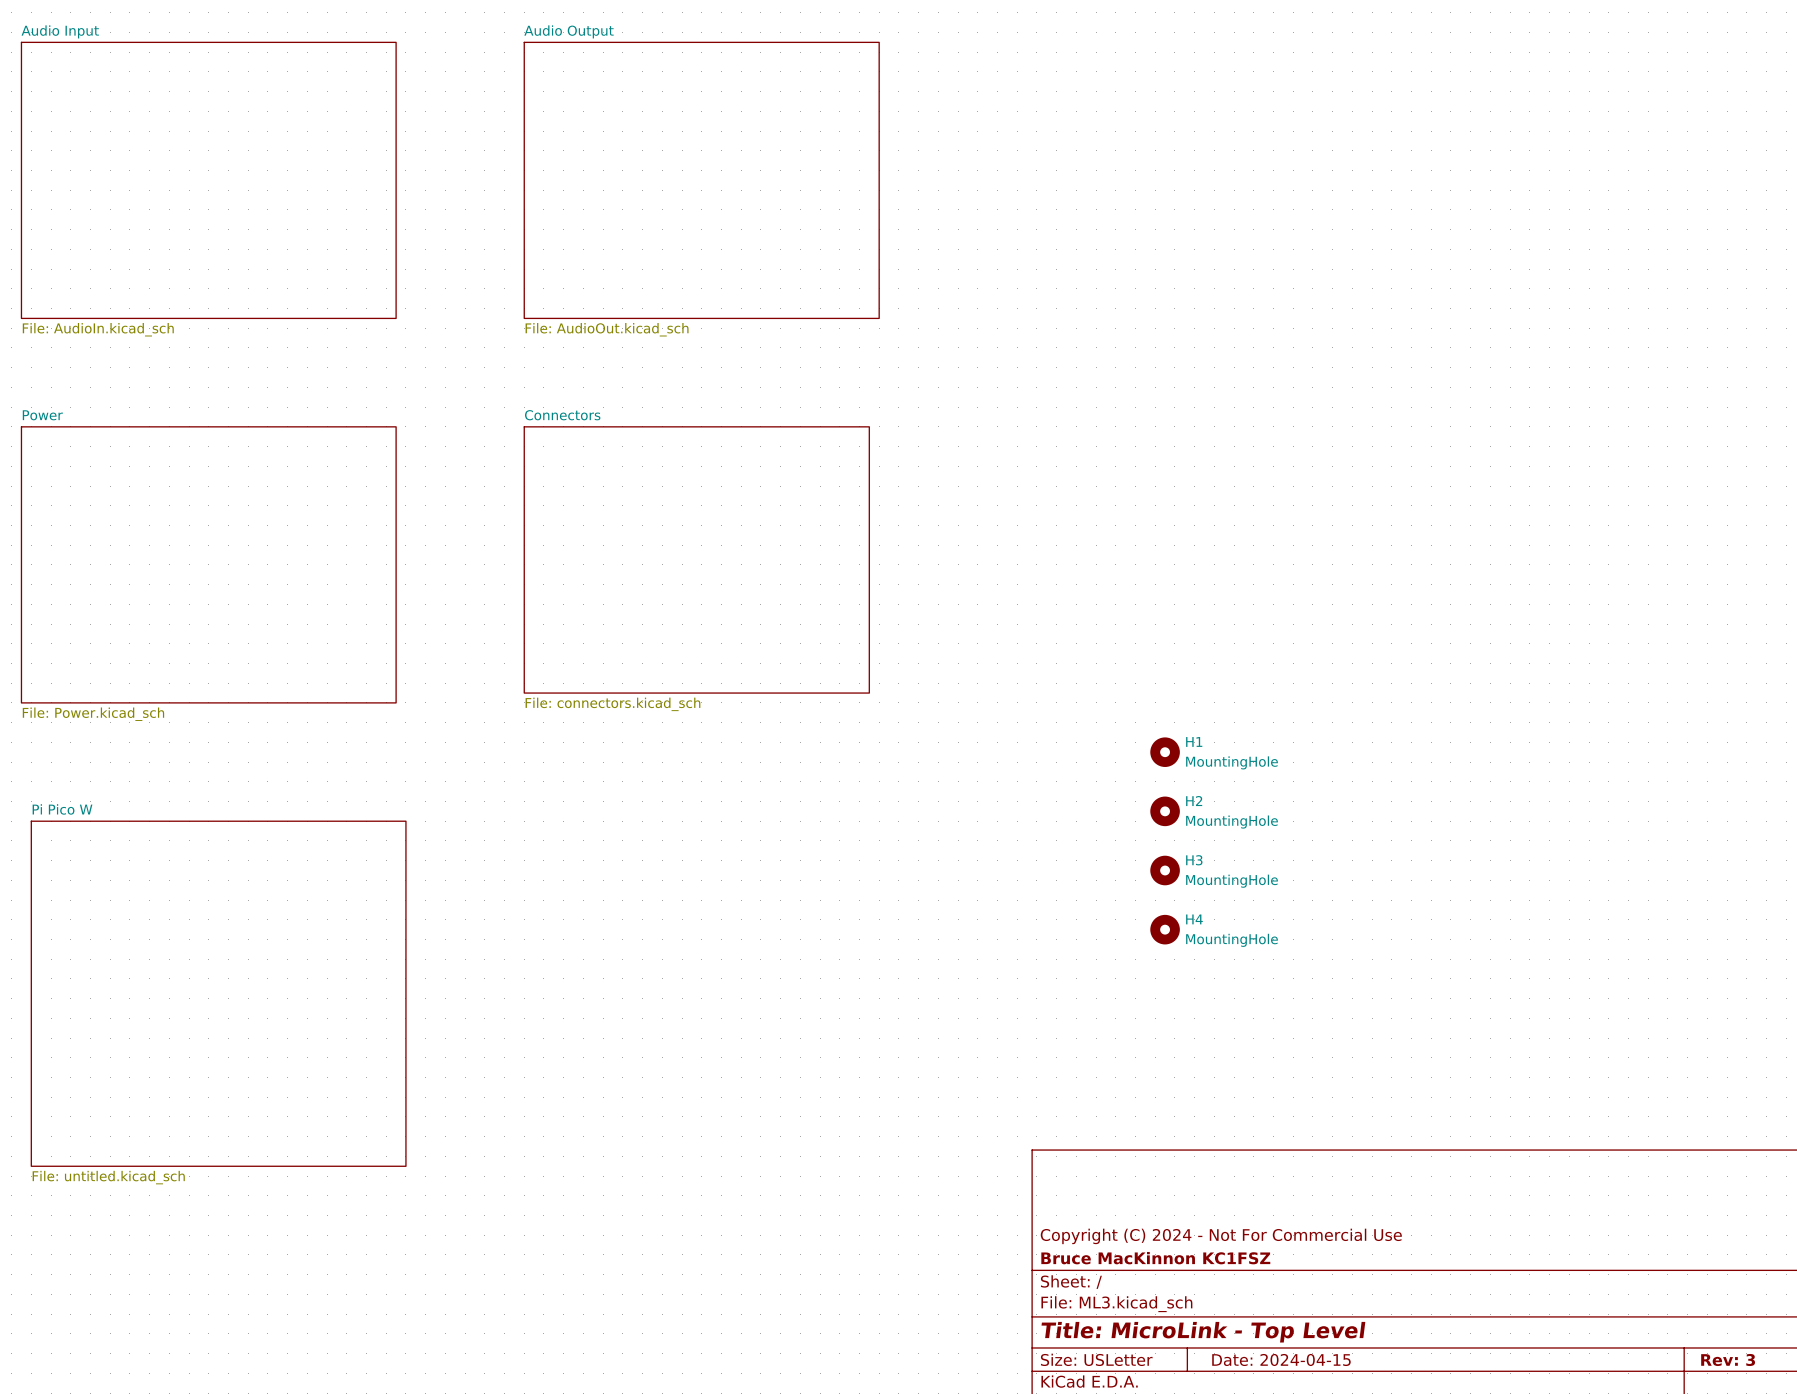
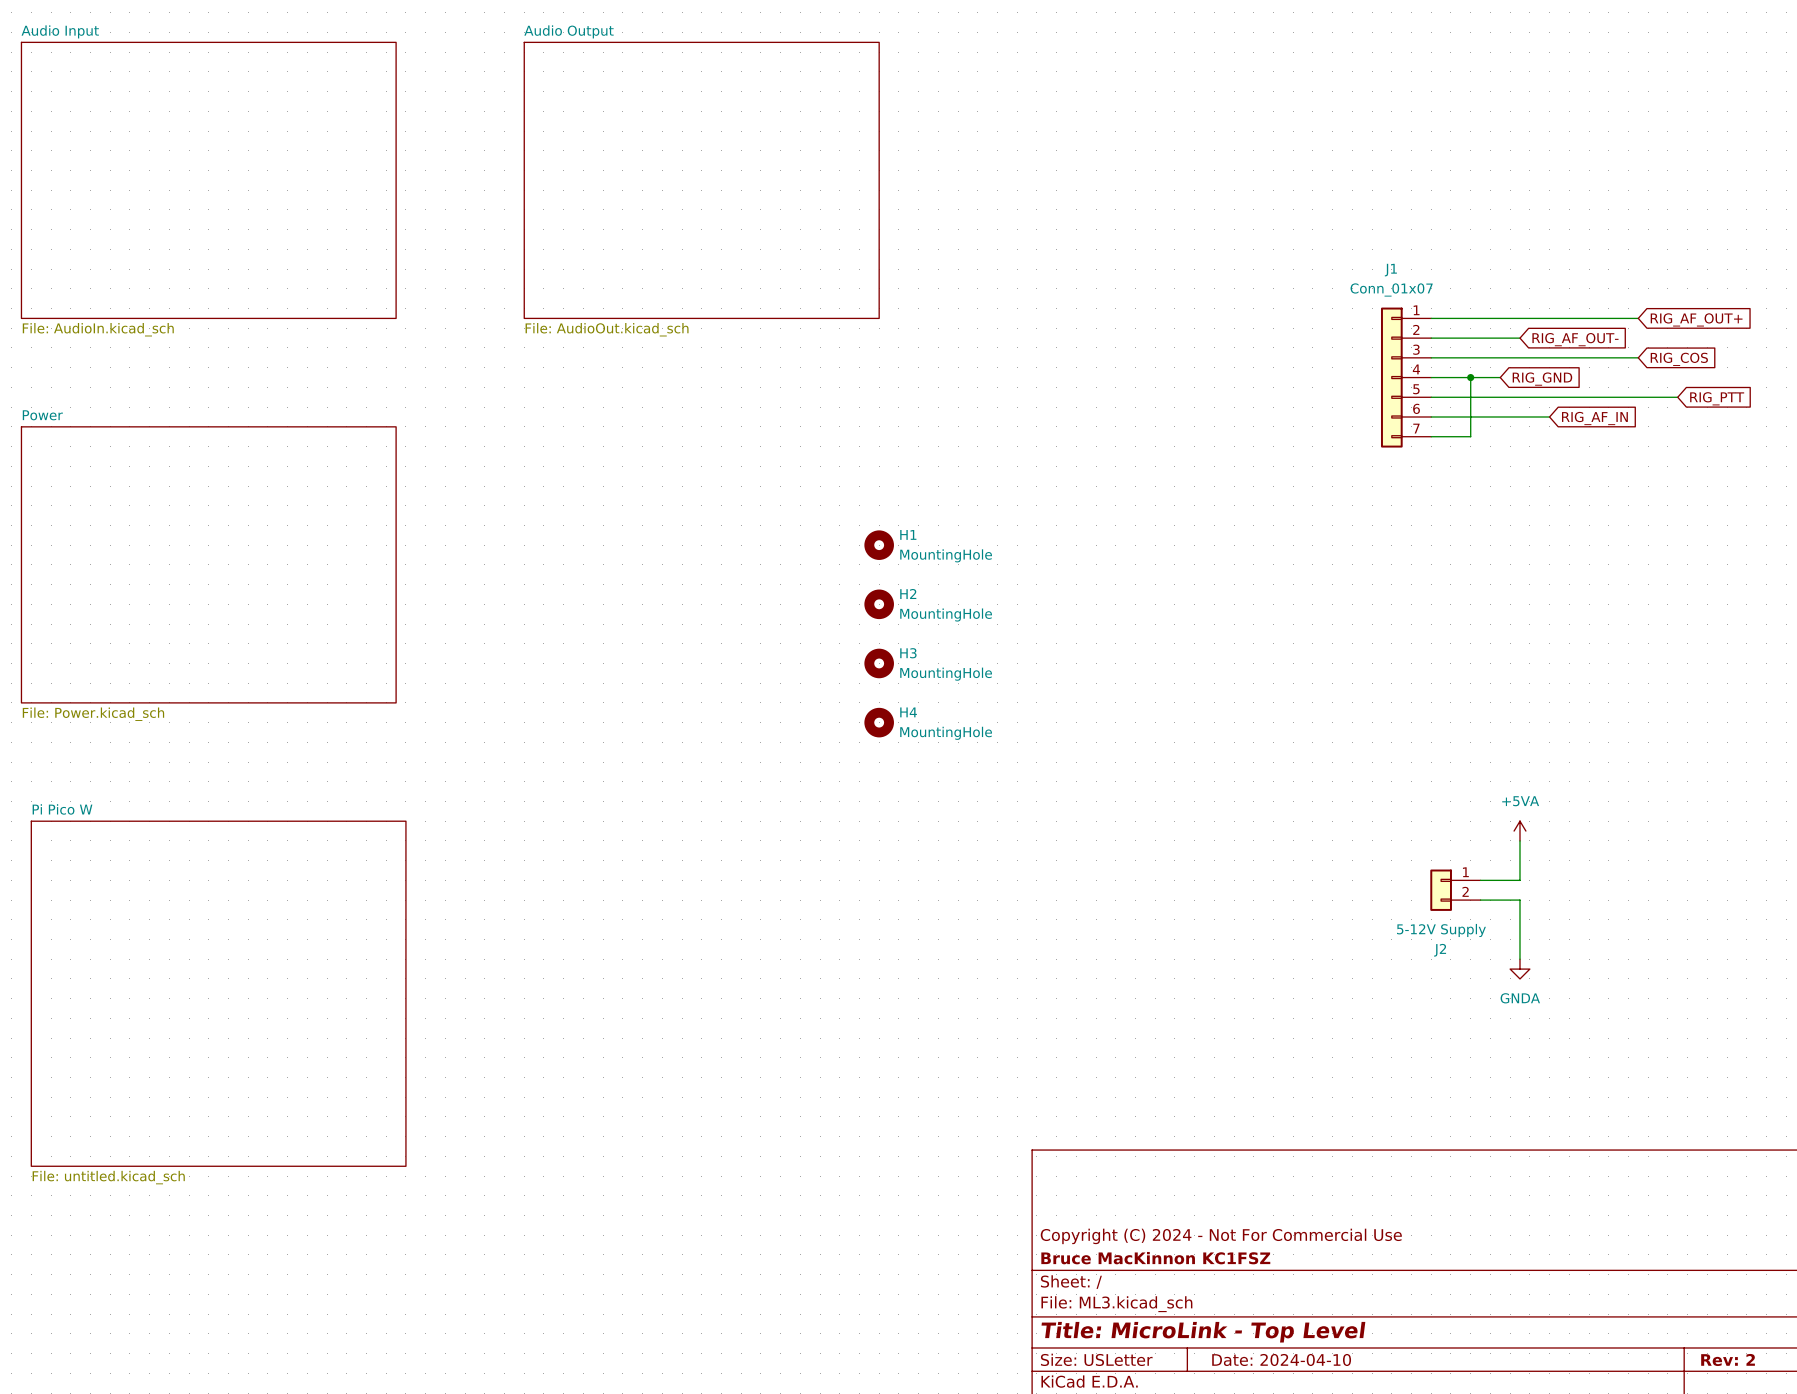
wire: none -> (1431, 318) (1638, 318)
global label: none -> RIG_AF_OUT+ (1696, 319)
wire: none -> (1431, 338) (1519, 338)
global label: none -> RIG_AF_OUT- (1575, 339)
wire: none -> (1431, 357) (1638, 357)
global label: none -> RIG_COS (1679, 359)
J1: none -> Conn_01x07 (1406, 377)
wire: none -> (1431, 377) (1500, 377)
wire: none -> (1470, 377) (1470, 436) (1431, 436)
junction: none -> (1470, 377)
global label: none -> RIG_GND (1542, 379)
wire: none -> (1431, 397) (1677, 397)
global label: none -> RIG_PTT (1717, 398)
wire: none -> (1431, 417) (1549, 417)
global label: none -> RIG_AF_IN (1594, 418)
sheet Connectors: File: connectors.kicad_sch (696, 559) -> none
H1 position: (1165, 752) -> (879, 545)
H2 position: (1165, 811) -> (879, 604)
power symbol: none -> +5VA (1519, 831)
wire: none -> (1519, 840) (1519, 880) (1480, 880)
H3 position: (1165, 870) -> (879, 663)
J2: none -> 5-12V Supply (1455, 890)
wire: none -> (1480, 900) (1519, 900) (1519, 959)
H4 position: (1165, 929) -> (879, 722)
power symbol: none -> GNDA (1519, 969)
title block: Date: 2024-04-15 (1281, 1359) -> Date: 2024-04-10 (1281, 1359)
title block: Rev: 3 (1728, 1359) -> Rev: 2 (1728, 1359)

